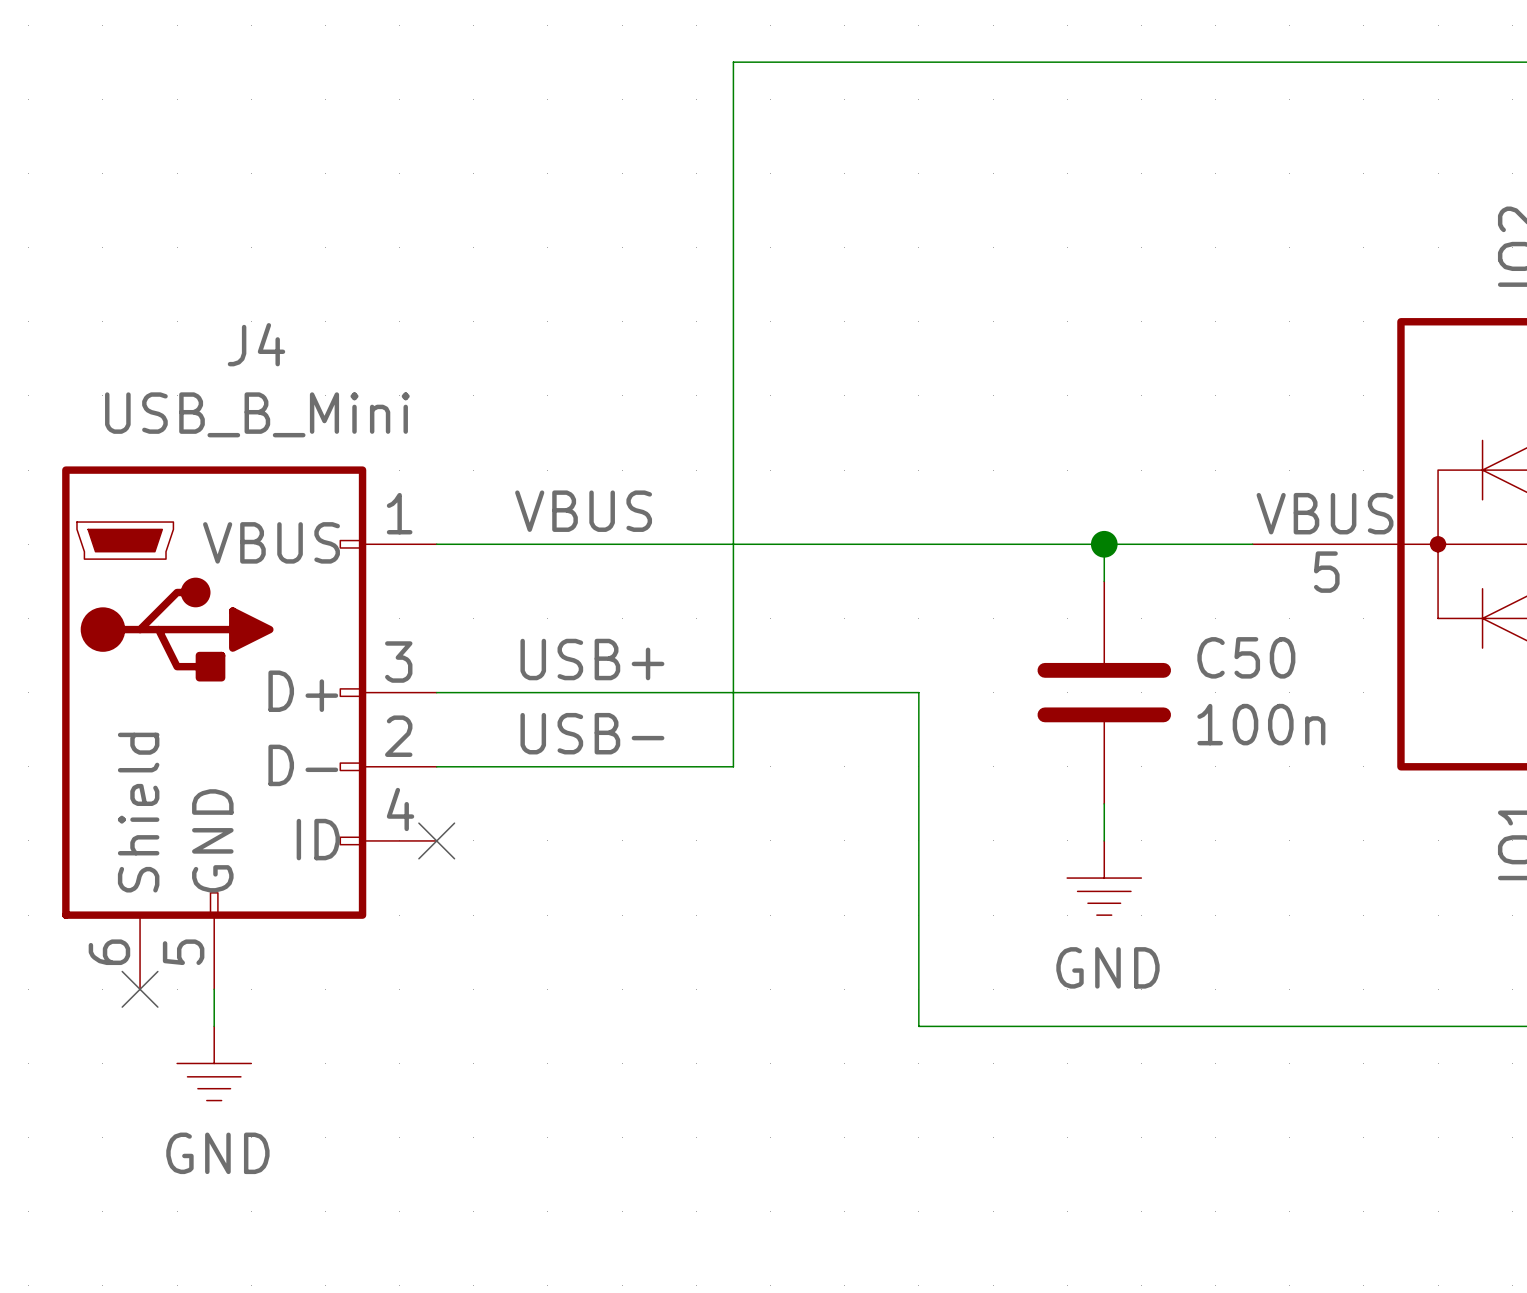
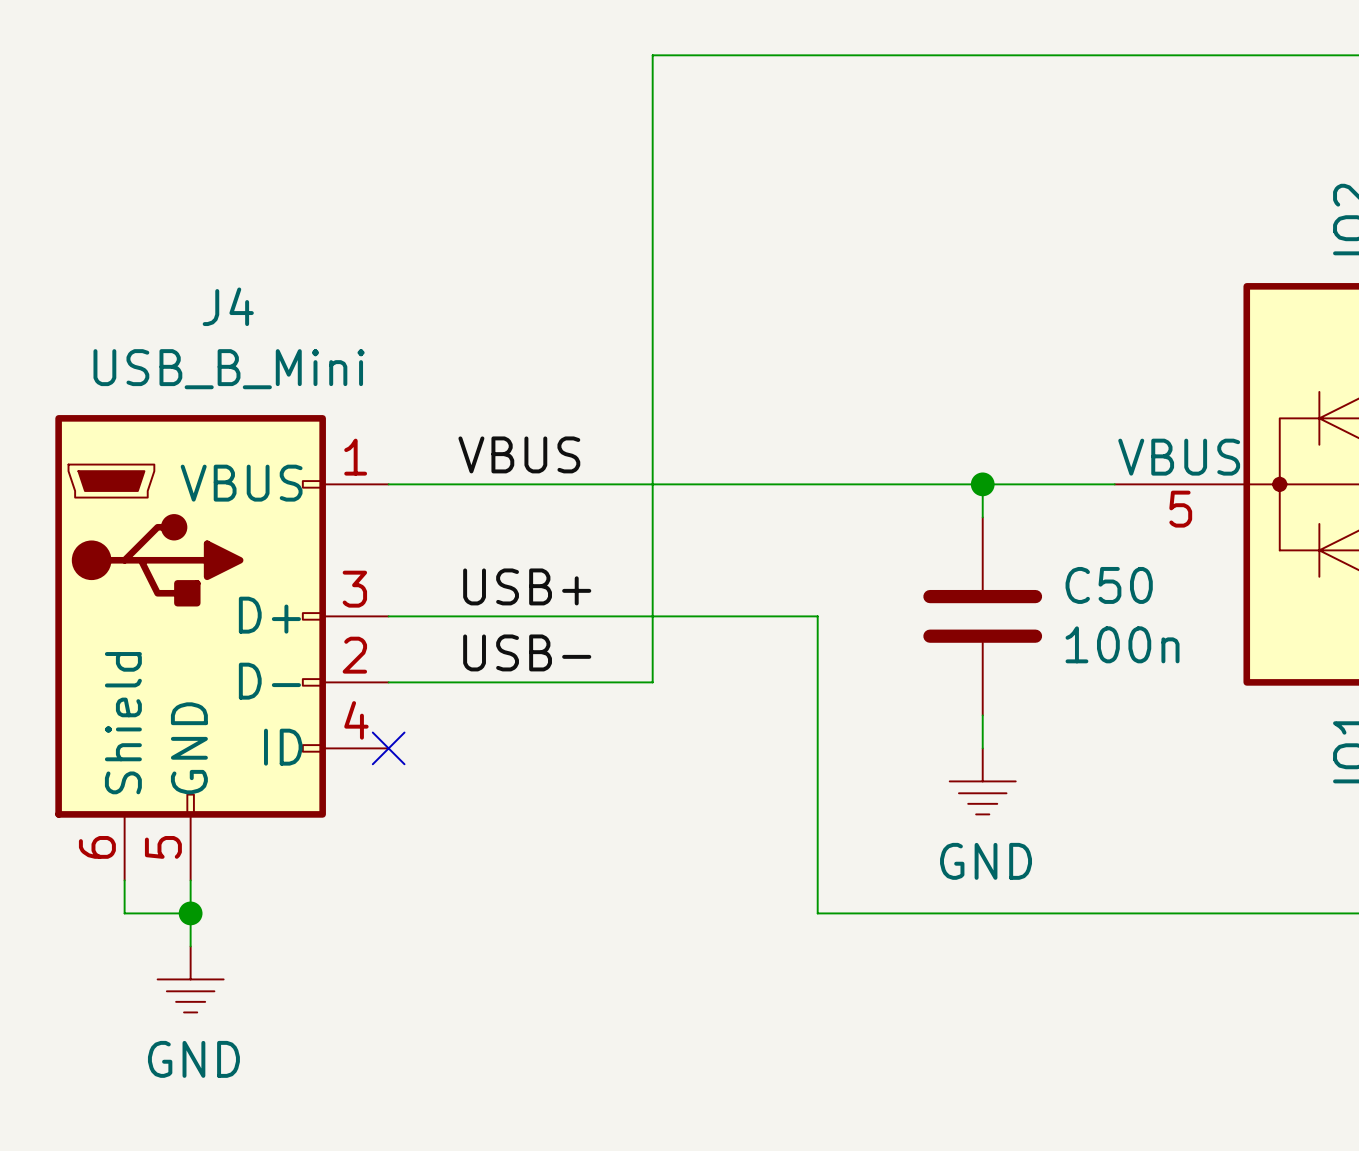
wire: none -> (124, 880) (124, 913) (190, 913) (190, 946)
no-connect mark: (140, 989) -> none
junction: none -> (190, 913)
power symbol position: GND (214, 1063) -> GND (190, 979)

